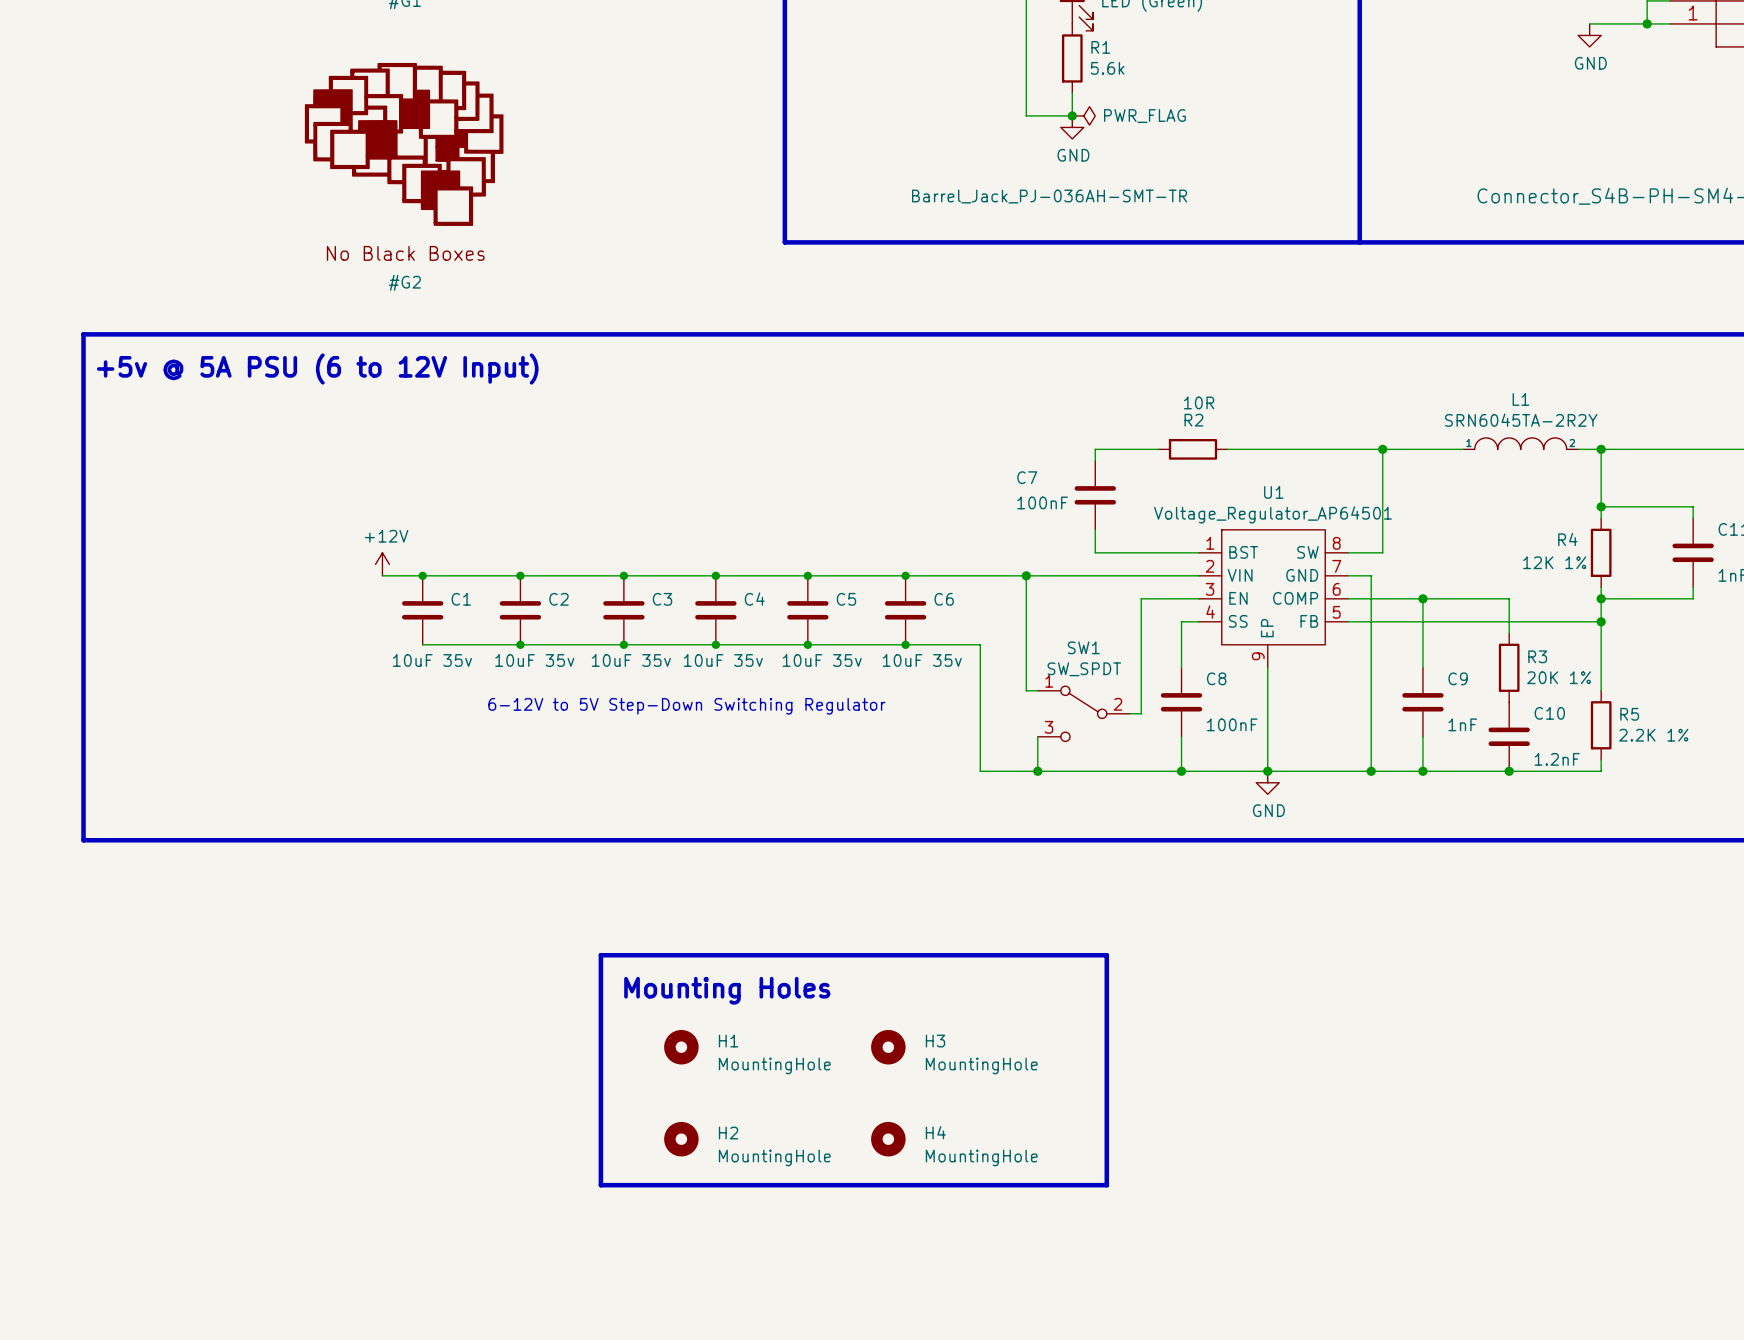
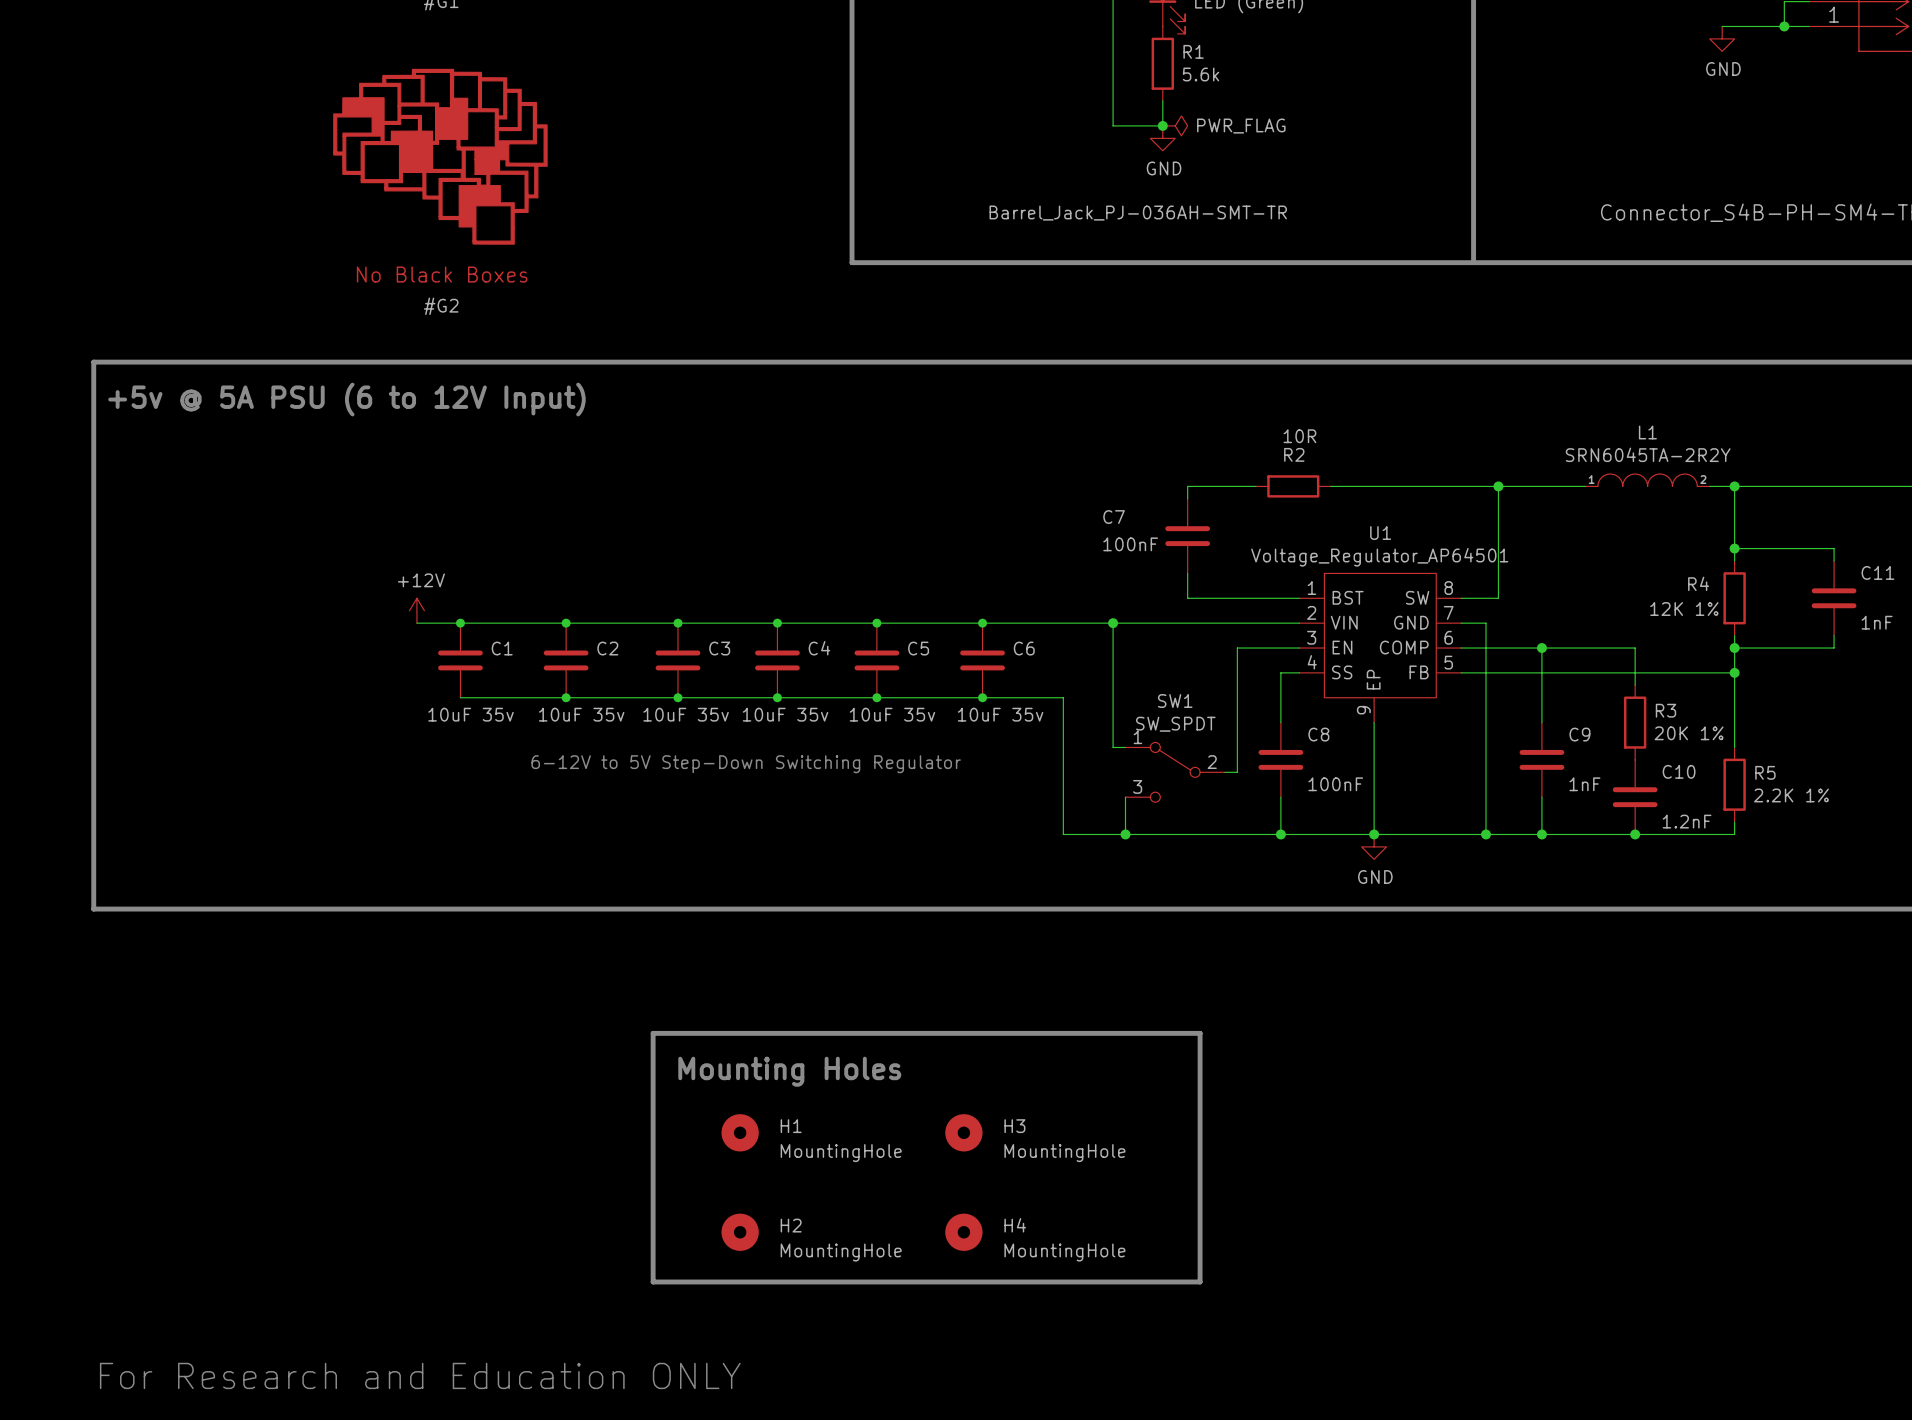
text: none -> For Research and Education ONLY (420, 1375)

